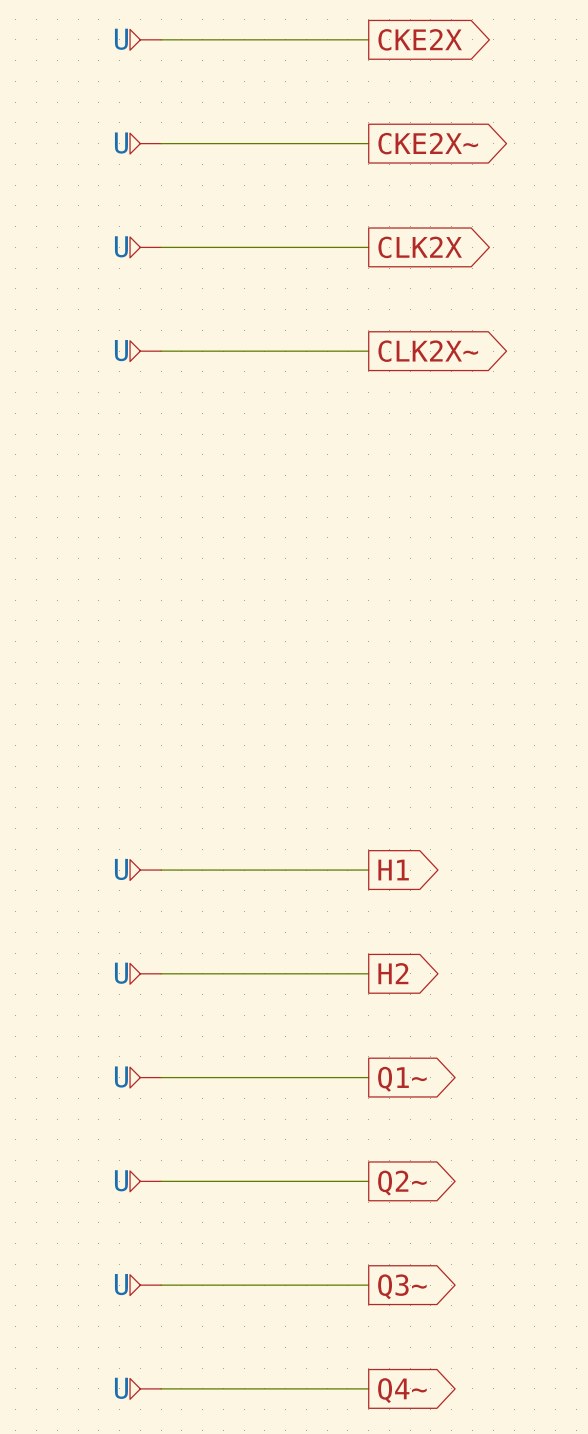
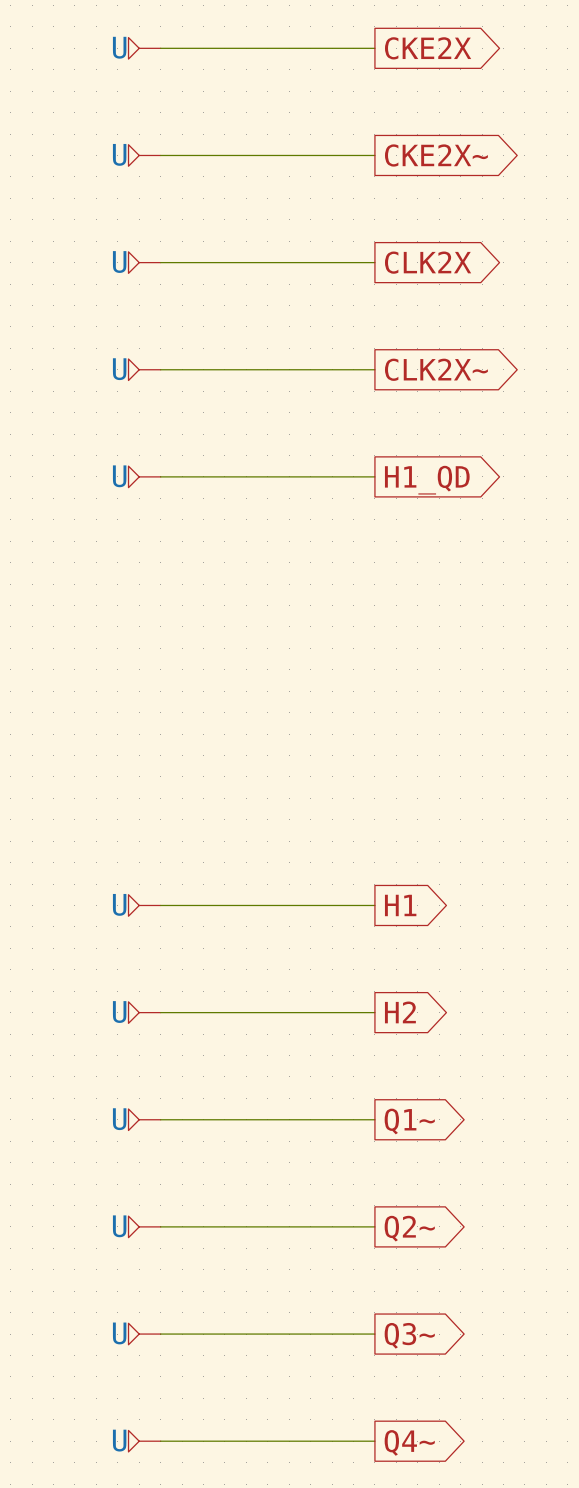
U: none -> (144, 476)
wire: none -> (160, 476) (374, 476)
global label: none -> H1_QD (427, 480)

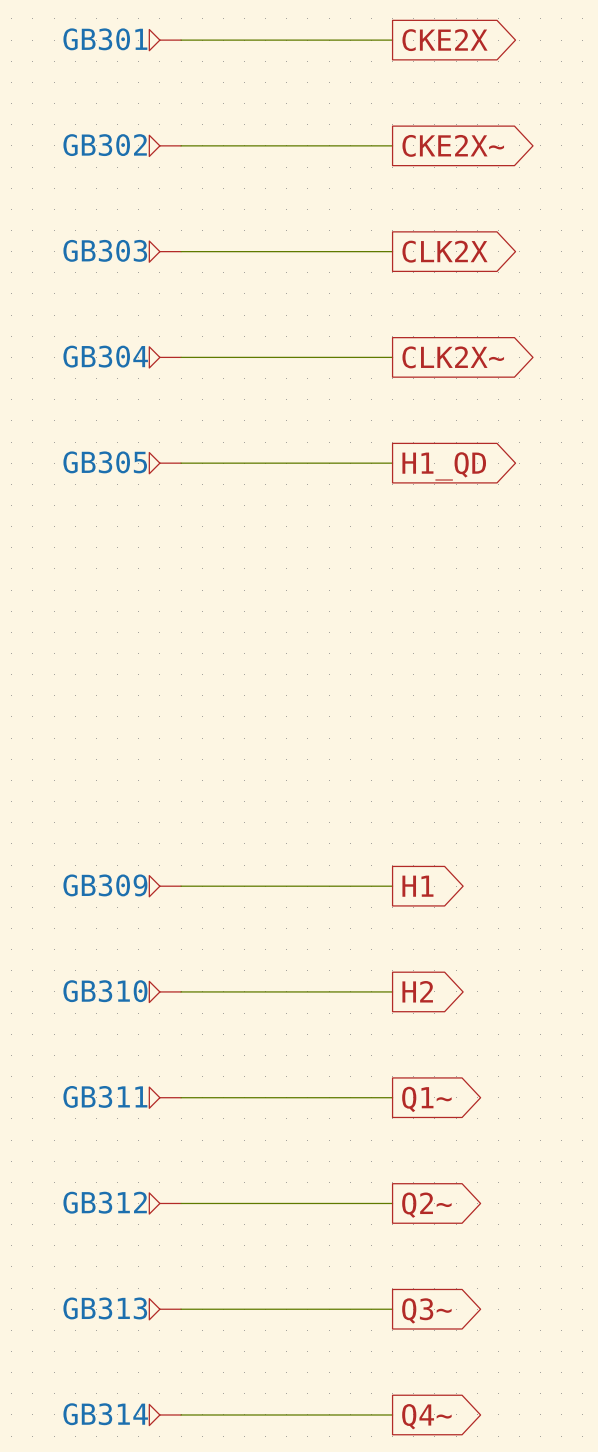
U name: U (119, 47) -> GB301 (105, 39)
U name: U (119, 154) -> GB302 (105, 145)
U name: U (119, 262) -> GB303 (105, 250)
U name: U (119, 369) -> GB304 (105, 356)
U name: U (119, 476) -> GB305 (105, 462)
U name: U (119, 904) -> GB309 (105, 885)
U name: U (119, 1012) -> GB310 (105, 991)
U name: U (119, 1119) -> GB311 (105, 1096)
U name: U (119, 1226) -> GB312 (105, 1202)
U name: U (119, 1333) -> GB313 (105, 1308)
U name: U (119, 1440) -> GB314 (105, 1414)

